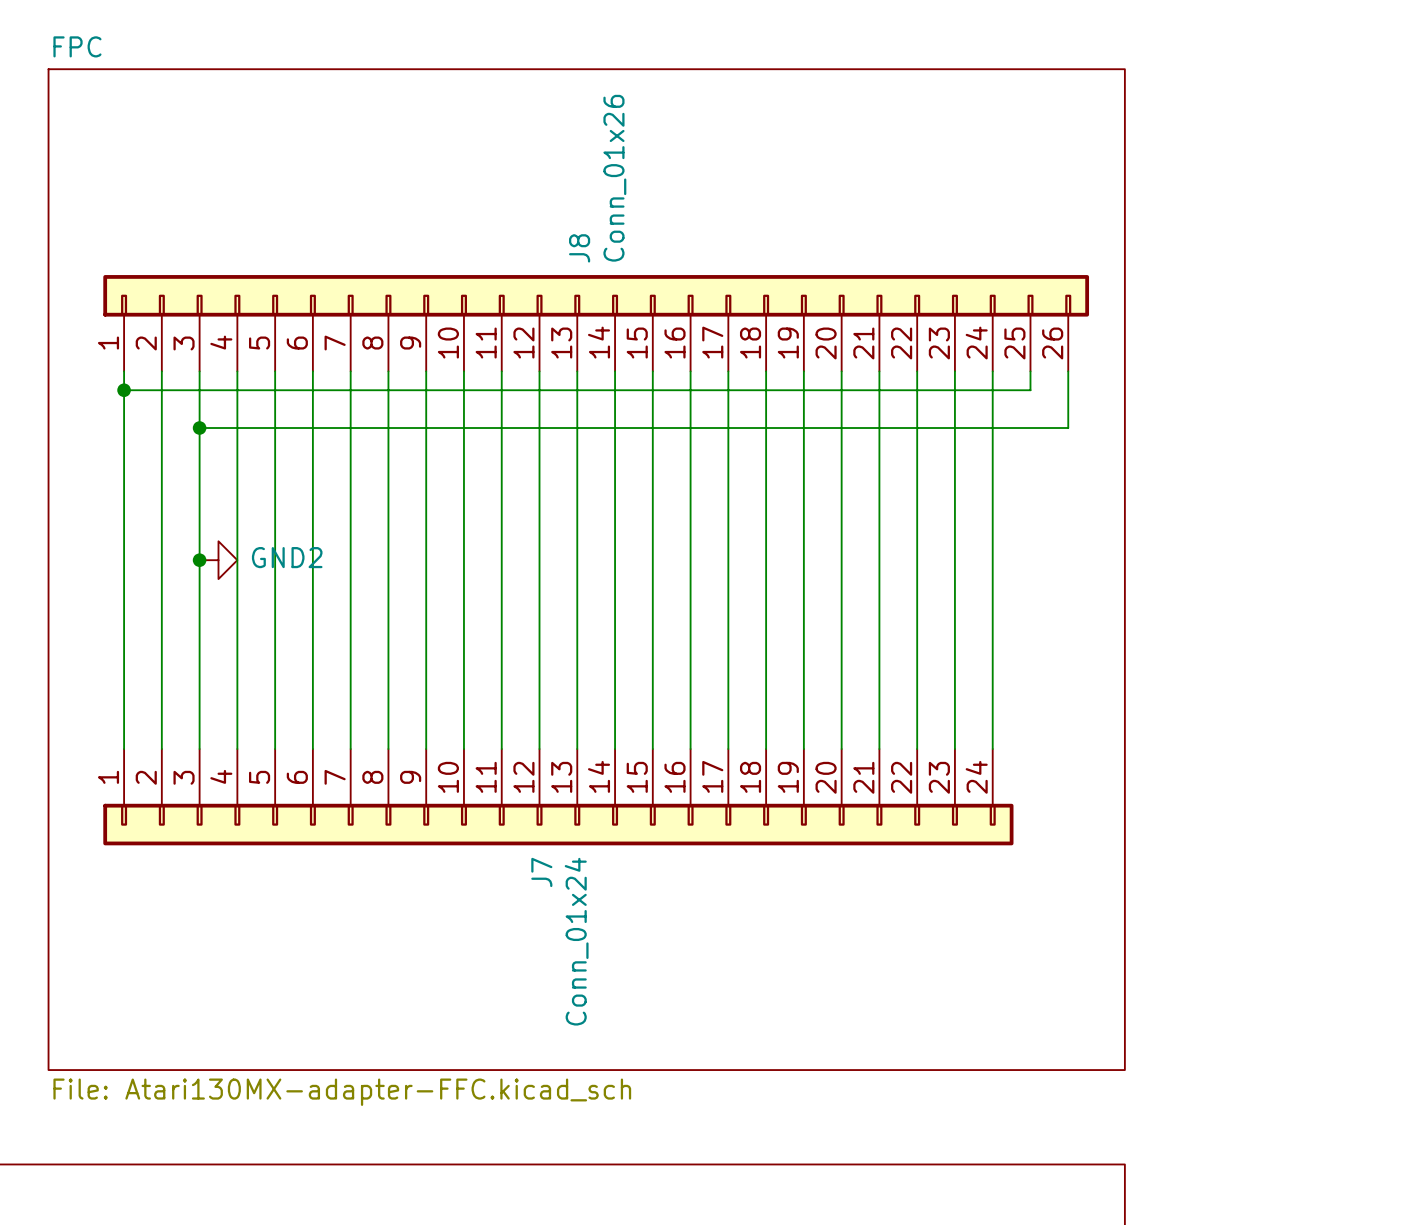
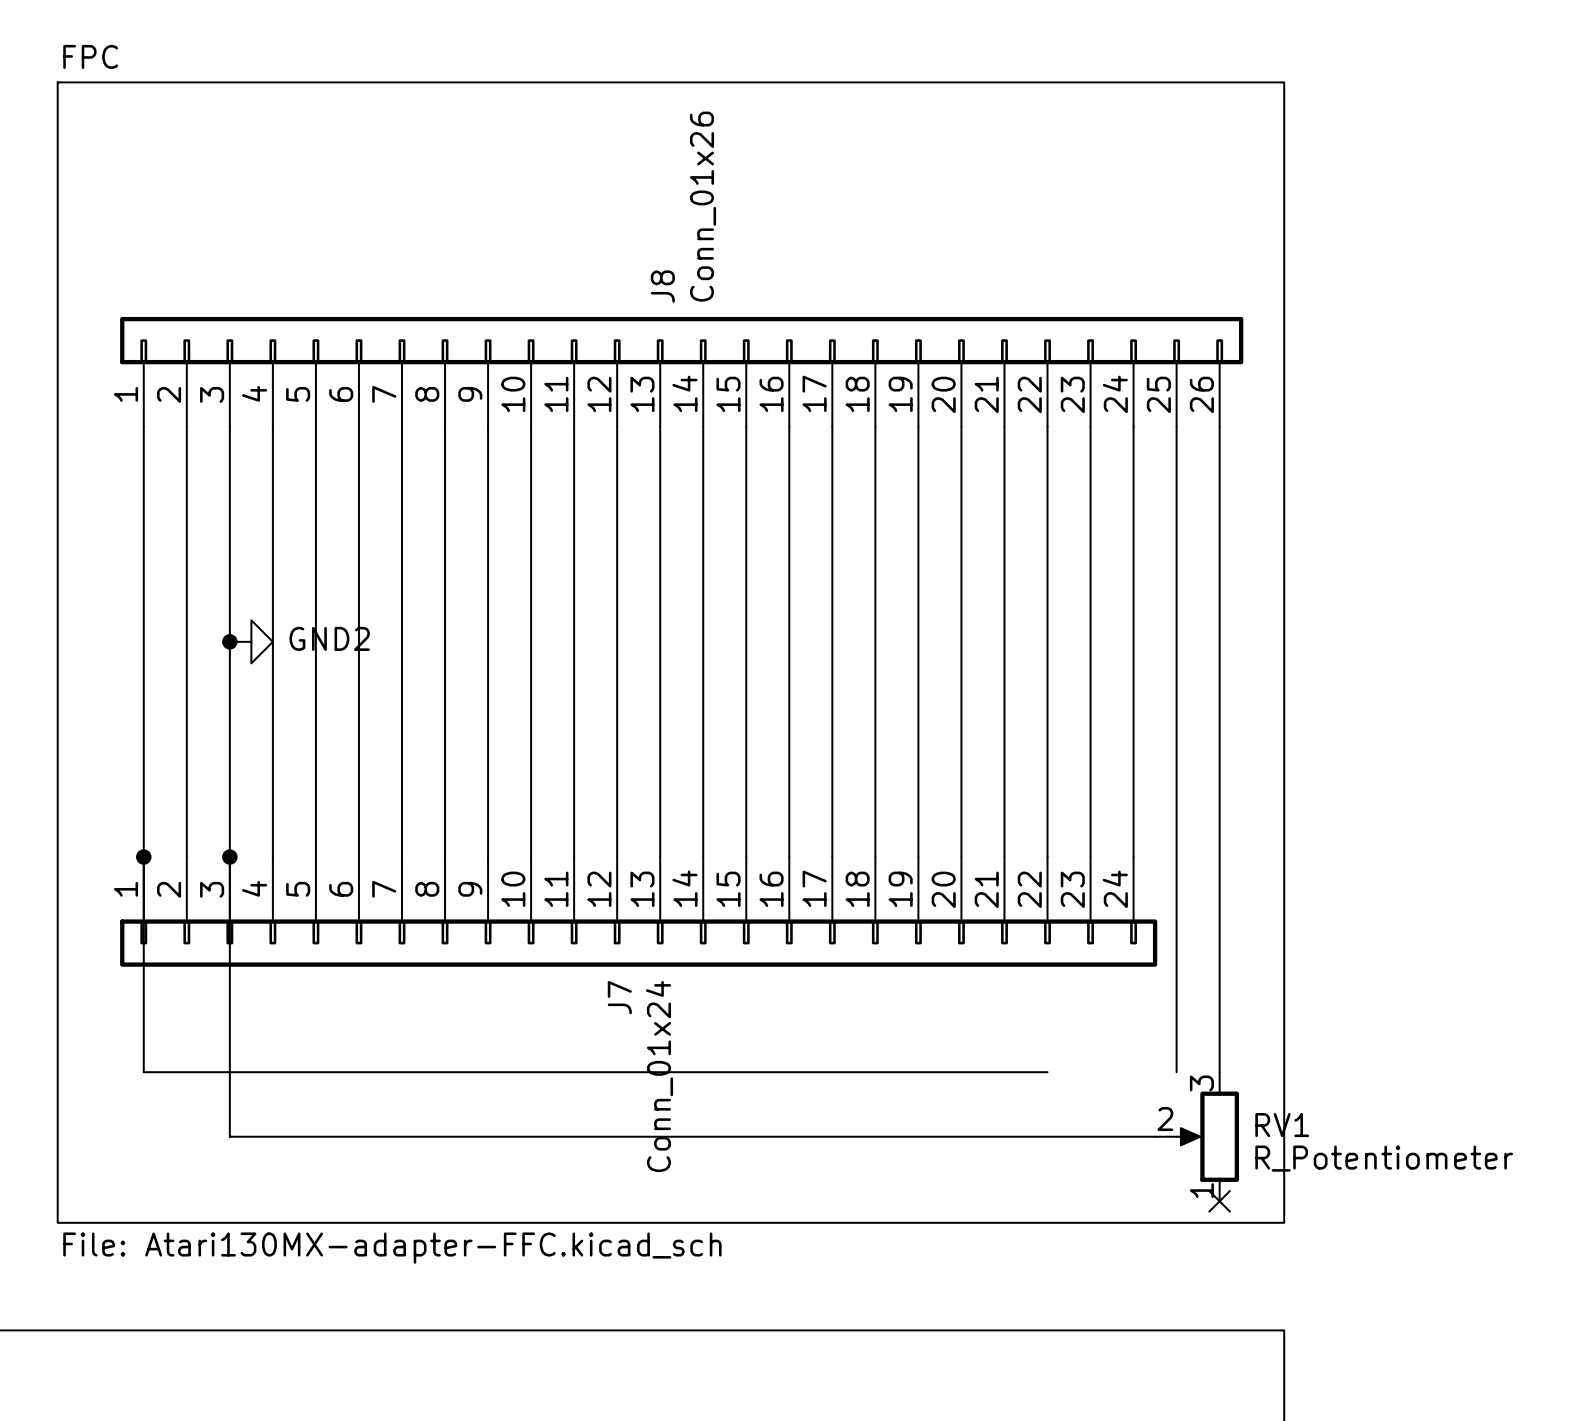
wire: (124, 390) (1030, 390) -> (1176, 1072) (1176, 448)
junction: (124, 390) -> none
wire: (199, 428) (1068, 428) -> (1219, 1072) (1219, 491)
junction: (199, 428) -> none
wire: none -> (143, 857) (143, 1072) (1047, 1072)
junction: none -> (143, 857)
wire: none -> (229, 857) (229, 1136) (1155, 1136)
junction: none -> (229, 857)
RV1: none -> R_Potentiometer (1197, 1136)
no-connect mark: none -> (1219, 1201)

